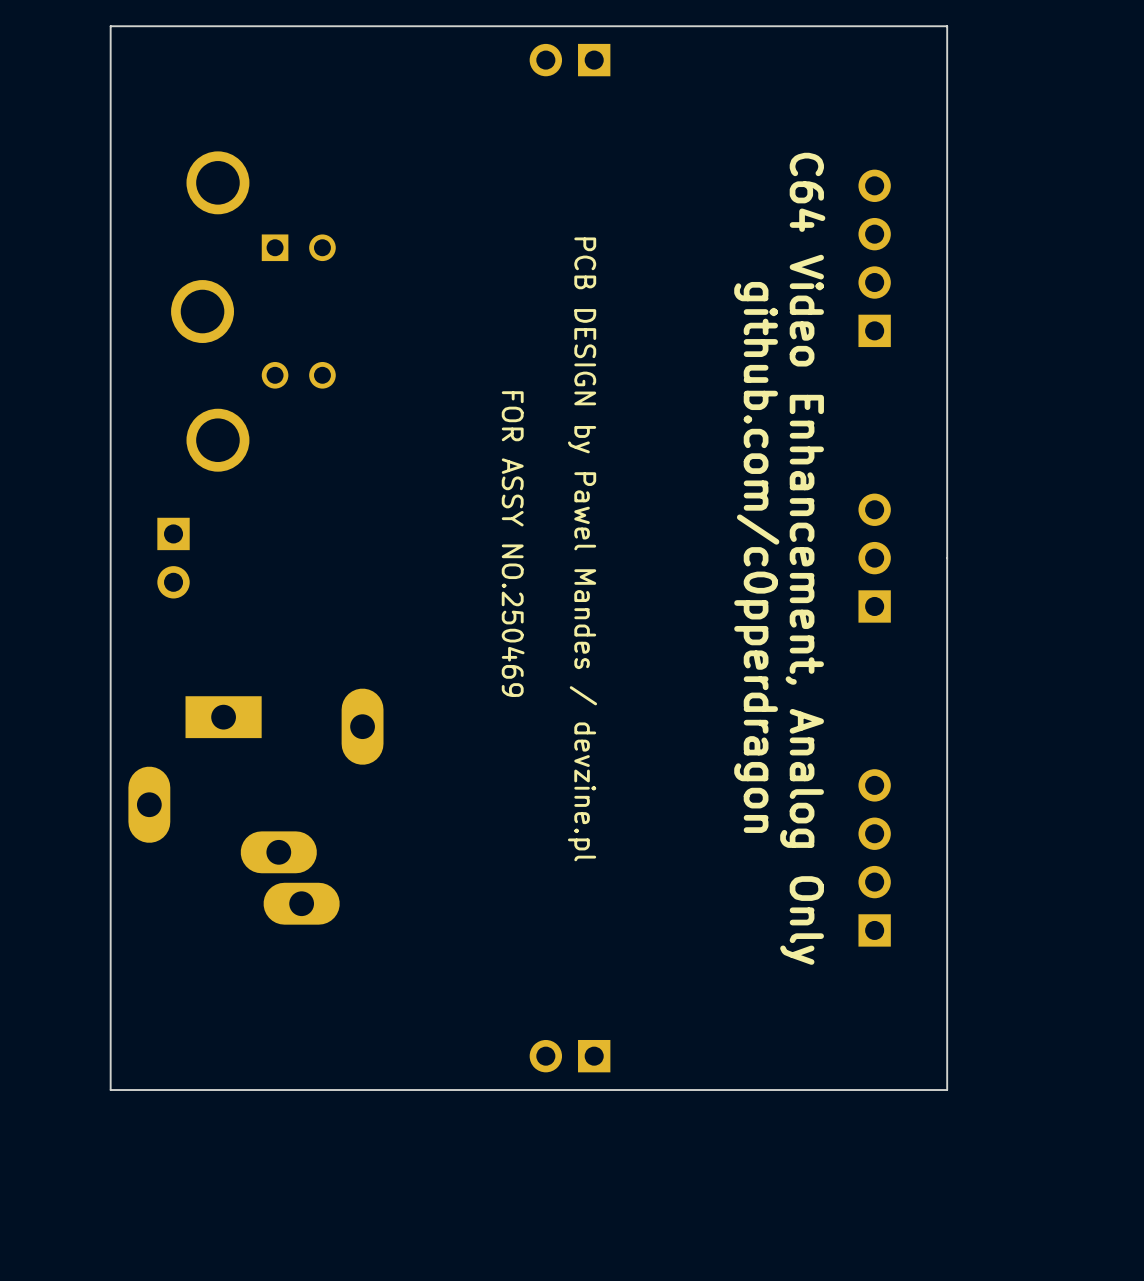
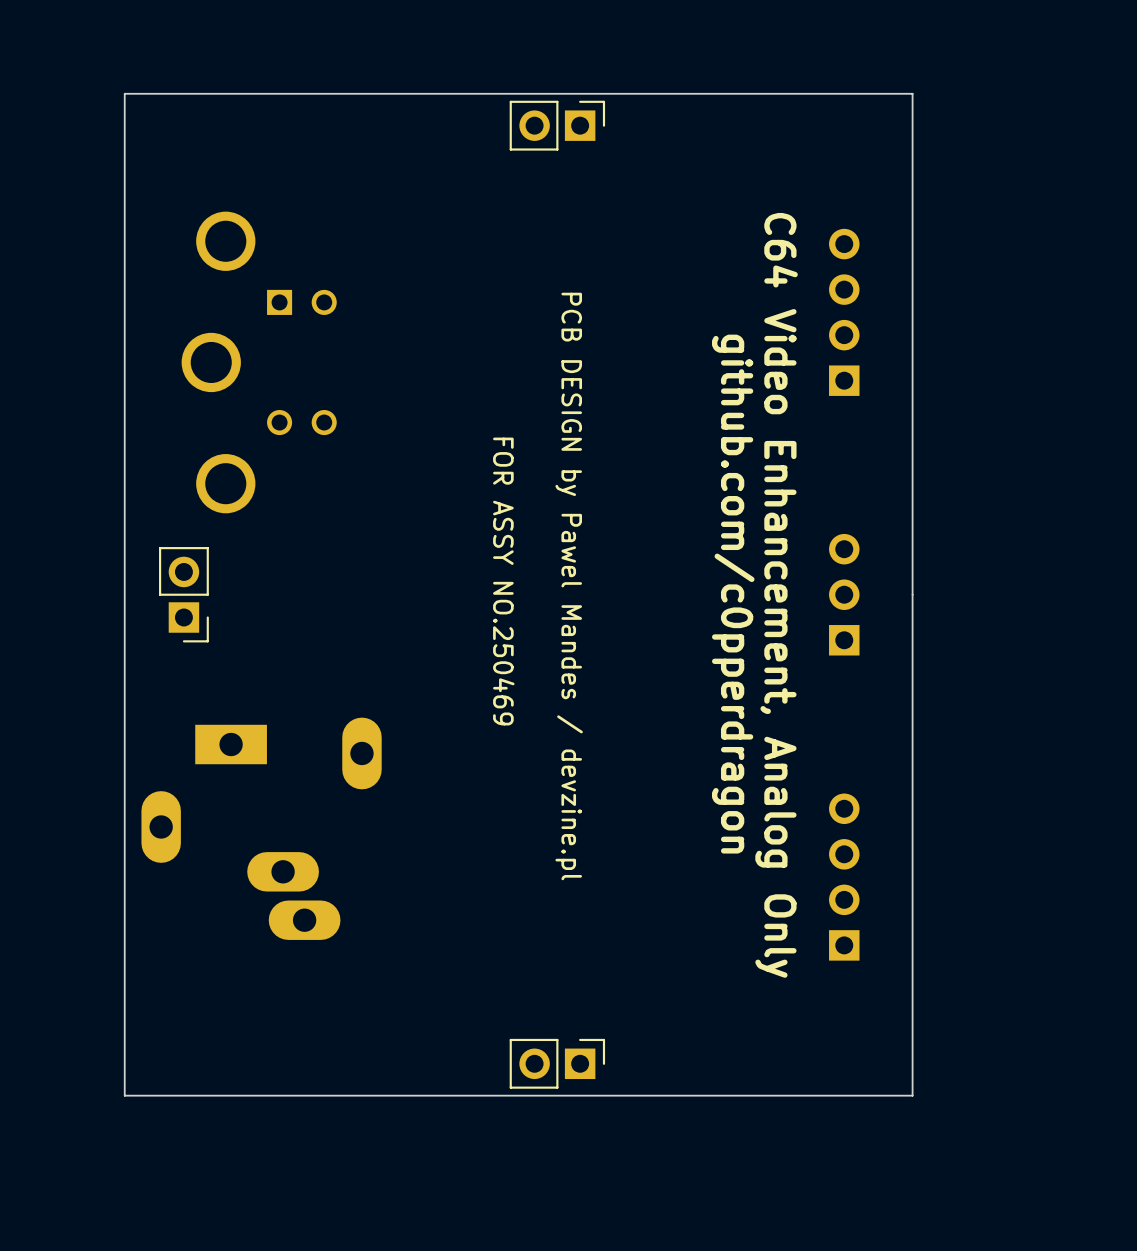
part side: top (570, 60) -> bottom (557, 125)
part side: top (173, 558) -> bottom (183, 594)
part side: top (570, 1056) -> bottom (557, 1063)

